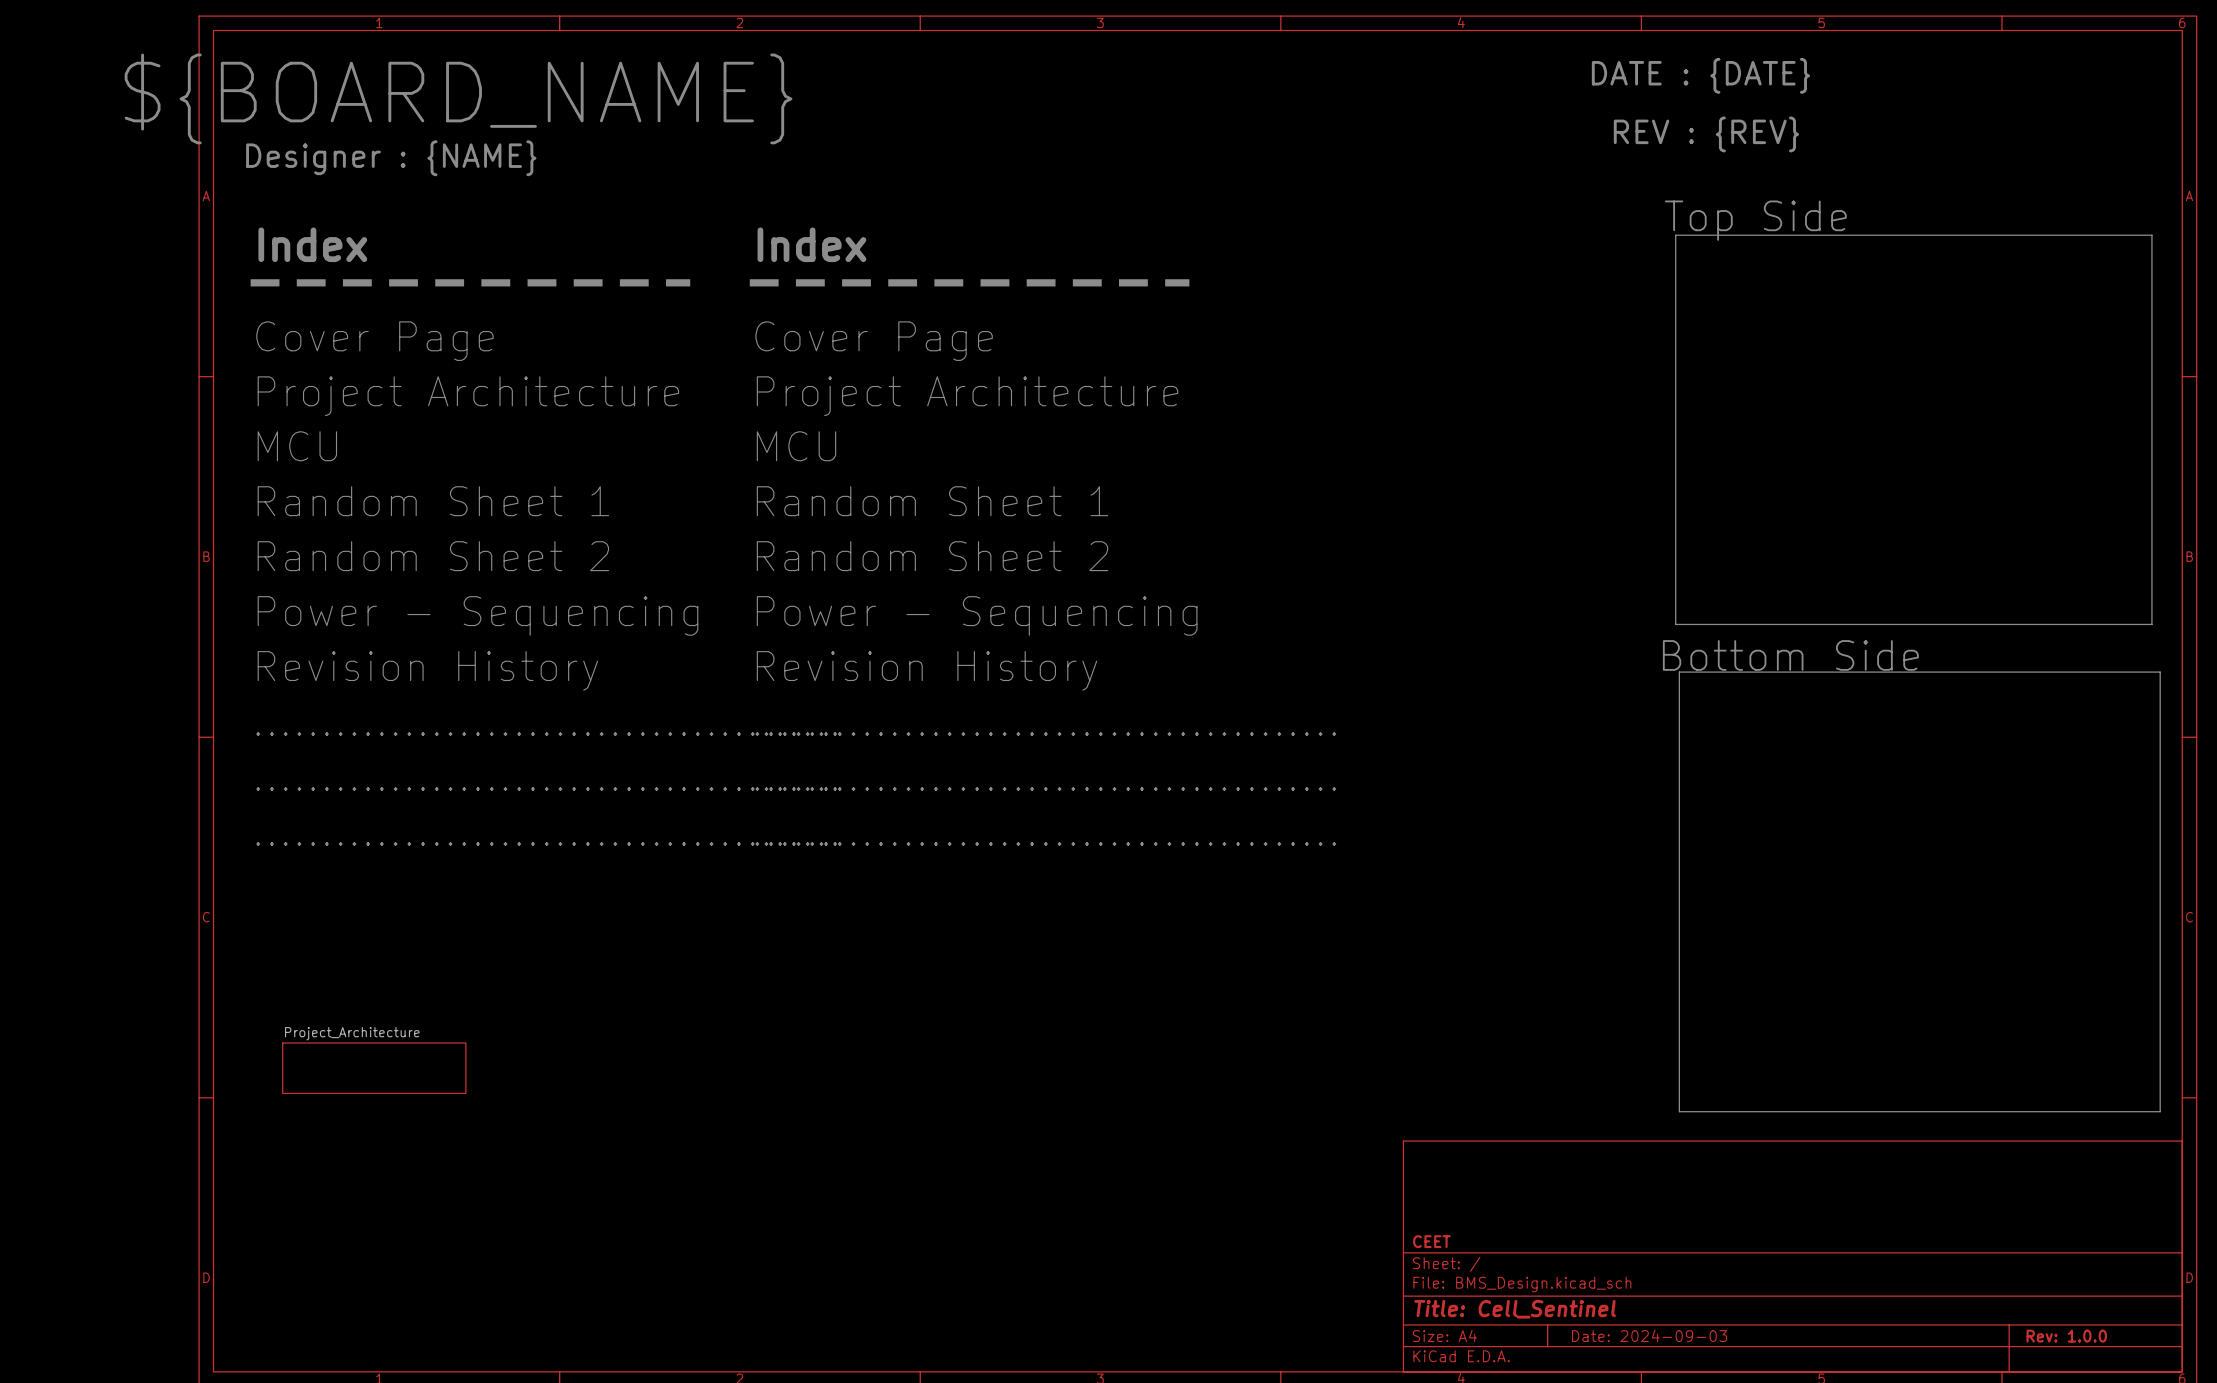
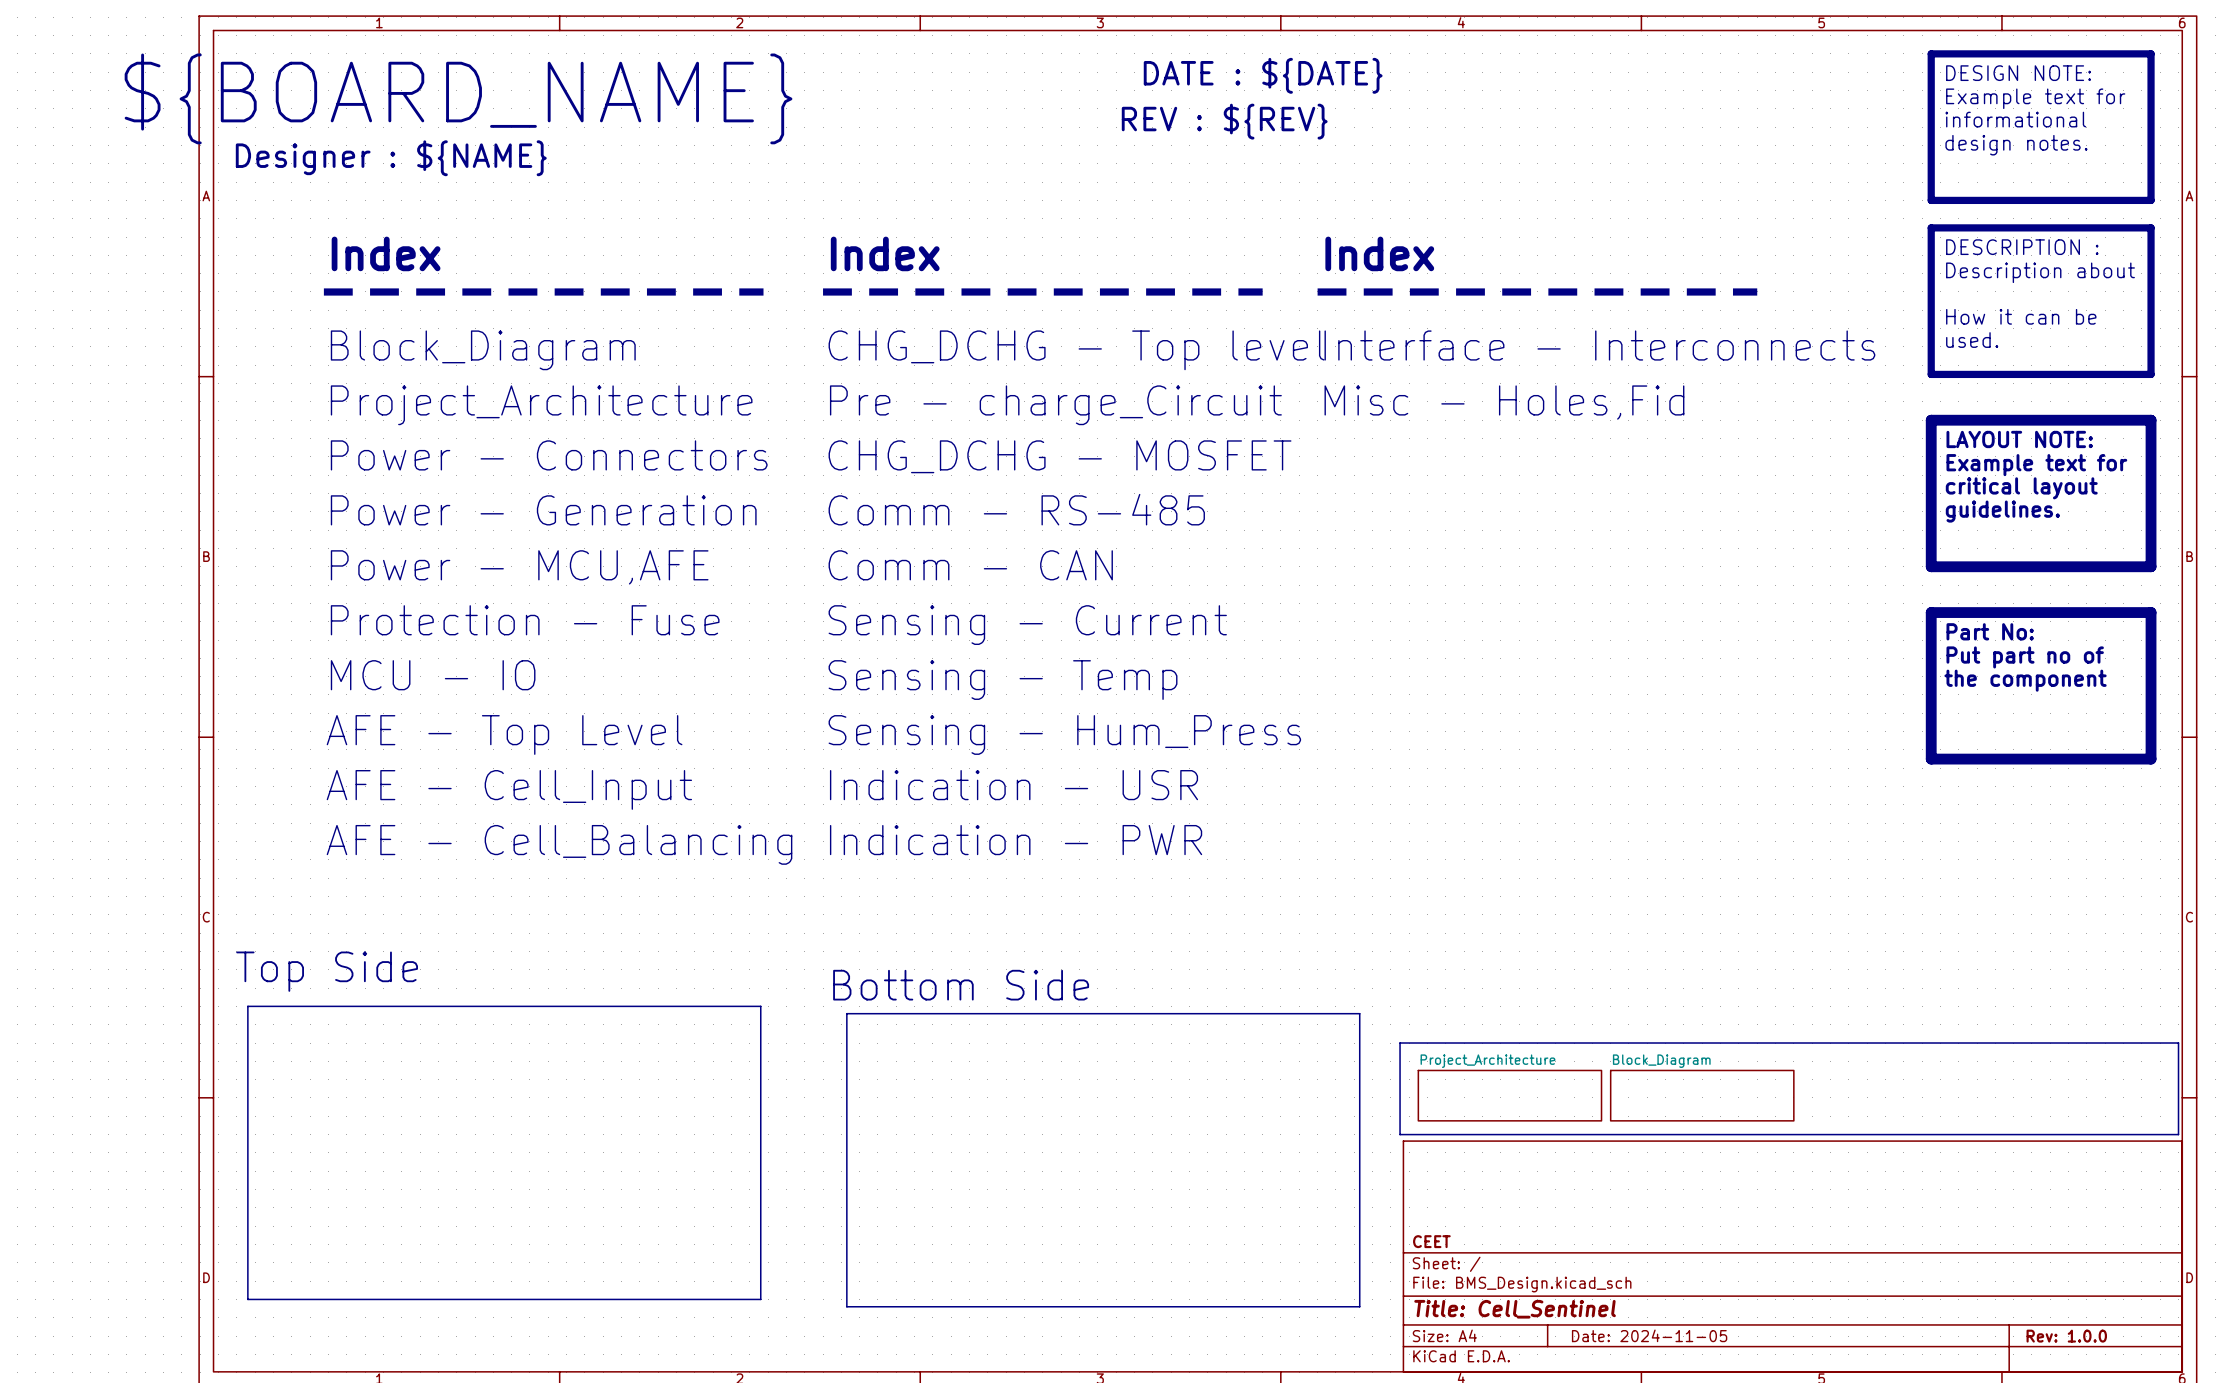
line: none -> (1931, 53) (2151, 53) (2151, 200) (1931, 200) (1931, 53)
text: none -> DESIGN NOTE: (2018, 73)
text: none -> DATE : ${DATE} (1263, 75)
text: DATE : {DATE} (1700, 75) -> none
text: none -> Example text for (2035, 98)
text: none -> informational (2015, 119)
text: none -> REV : ${REV} (1224, 121)
text: REV : {REV} (1706, 134) -> none
text: none -> design notes. (2016, 145)
text: Designer : {NAME} (391, 158) -> Designer : ${NAME} (391, 158)
text: Top Side (1755, 220) -> none
line: none -> (1931, 227) (1931, 374) (2151, 374) (2151, 227) (1931, 227)
line: (1675, 235) (2151, 235) (2151, 624) (1675, 624) (1675, 235) -> none
text position: Index (312, 244) -> Index (386, 253)
text position: Index (811, 244) -> Index (885, 253)
text: none -> DESCRIPTION : (2022, 247)
text: none -> Index (1379, 253)
text: none -> Description about (2040, 272)
line: (250, 282) (690, 282) -> (323, 291) (763, 291)
line: (749, 282) (1189, 282) -> (823, 291) (1262, 291)
line: none -> (1317, 291) (1757, 291)
text: none -> How it can be (2021, 316)
text: none -> used. (1972, 340)
text: Cover Page (374, 341) -> none
text: Cover Page (874, 341) -> none
text: none -> Interface - Interconnects (1599, 345)
text: none -> Block_Diagram (483, 350)
text: none -> CHG_DCHG - Top level (1076, 350)
text: Project Architecture (468, 396) -> Project_Architecture (541, 405)
text: Project Architecture (967, 396) -> none
text: none -> Misc - Holes,Fid (1504, 402)
text: none -> Pre - charge_Circuit (1055, 405)
line: none -> (1931, 420) (2151, 420) (2151, 566) (1931, 566) (1931, 420)
text: none -> LAYOUT NOTE: (2019, 439)
text: MCU (297, 446) -> none
text: MCU (796, 446) -> none
text: none -> Power - Connectors (549, 455)
text: none -> CHG_DCHG - MOSFET (1060, 456)
text: none -> Example text for (2036, 465)
text: none -> critical layout (2021, 488)
text: Random Sheet 1 (433, 501) -> none
text: Random Sheet 1 (932, 501) -> none
text: none -> Comm - RS-485 (1016, 509)
text: none -> Power - Generation (543, 510)
text: none -> guidelines. (2002, 511)
text: Random Sheet 2 (433, 556) -> none
text: Random Sheet 2 (932, 556) -> none
text: none -> Comm - CAN (970, 565)
text: none -> Power - MCU,AFE (519, 567)
line: none -> (1931, 612) (1931, 759) (2151, 759) (2151, 612) (1931, 612)
text: Power - Sequencing (477, 615) -> none
text: Power - Sequencing (977, 615) -> none
text: none -> Protection - Fuse (525, 620)
text: none -> Sensing - Current (1027, 625)
text: none -> Part No: (1990, 631)
text: Bottom Side (1790, 655) -> none
text: none -> Put part no of (2025, 657)
text: Revision History (427, 670) -> none
text: Revision History (927, 670) -> none
line: (1679, 672) (2160, 672) (2160, 1111) (1679, 1111) (1679, 672) -> none
text: none -> MCU - IO (433, 675)
text: none -> Sensing - Temp (1003, 680)
text: none -> the component (2025, 680)
text: none -> AFE - Top Level (504, 734)
text: ........................................... (546, 734) -> none
text: ........................................... (1045, 734) -> none
text: none -> Sensing - Hum_Press (1064, 734)
text: none -> Indication - USR (1014, 785)
text: none -> AFE - Cell_Input (509, 789)
text: ........................................... (546, 789) -> none
text: ........................................... (1045, 789) -> none
text: none -> Indication - PWR (1016, 840)
text: ........................................... (546, 843) -> none
text: ........................................... (1045, 843) -> none
text: none -> AFE - Cell_Balancing (559, 844)
text: none -> Top Side (327, 971)
text: none -> Bottom Side (961, 985)
line: none -> (247, 1006) (760, 1006) (760, 1299) (247, 1299) (247, 1006)
line: none -> (846, 1013) (1359, 1013) (1359, 1306) (846, 1306) (846, 1013)
line: none -> (1400, 1043) (2178, 1043) (2178, 1134) (1400, 1134) (1400, 1043)
sheet Project_Architecture: (374, 1068) -> none
sheet Project_Architecture: none -> (1509, 1095)
sheet Block_Diagram: none -> (1702, 1095)
title block: Date: 2024-09-03 (1649, 1335) -> Date: 2024-11-05 (1649, 1335)

